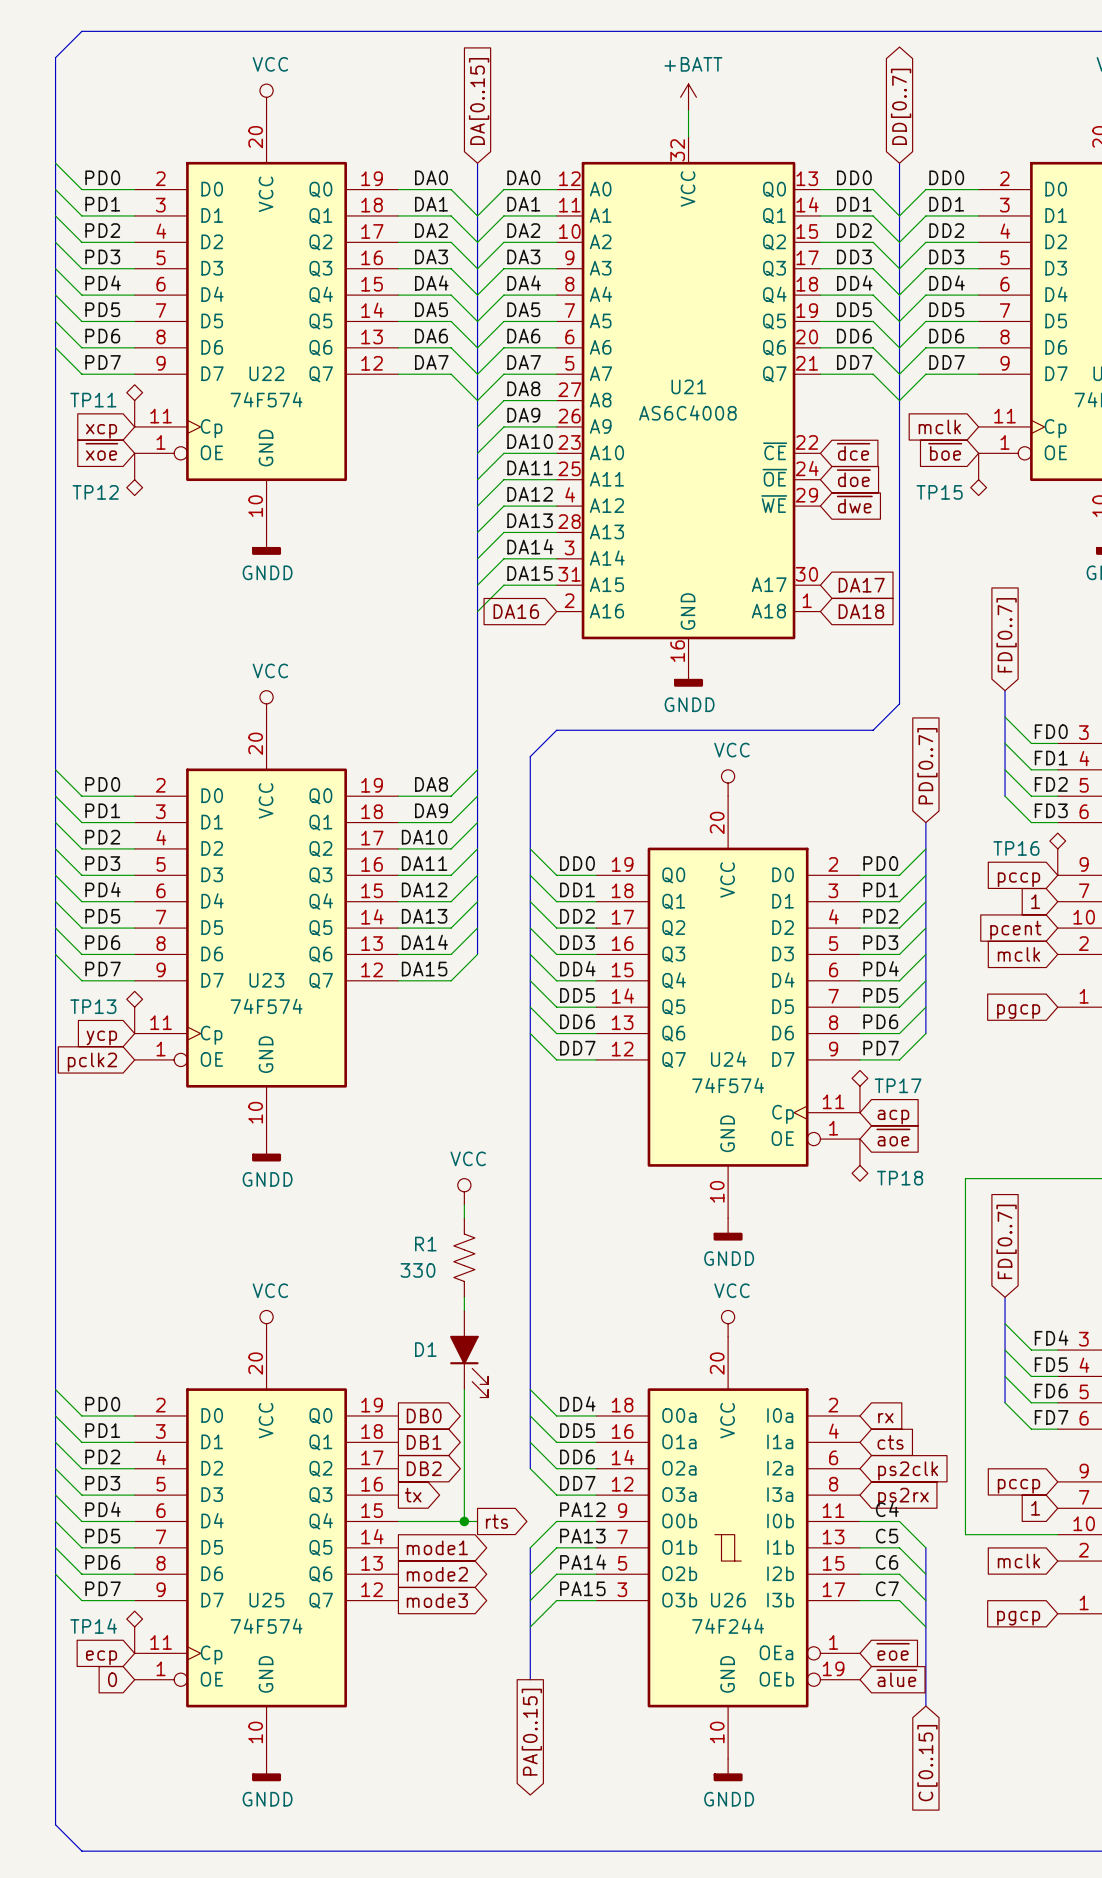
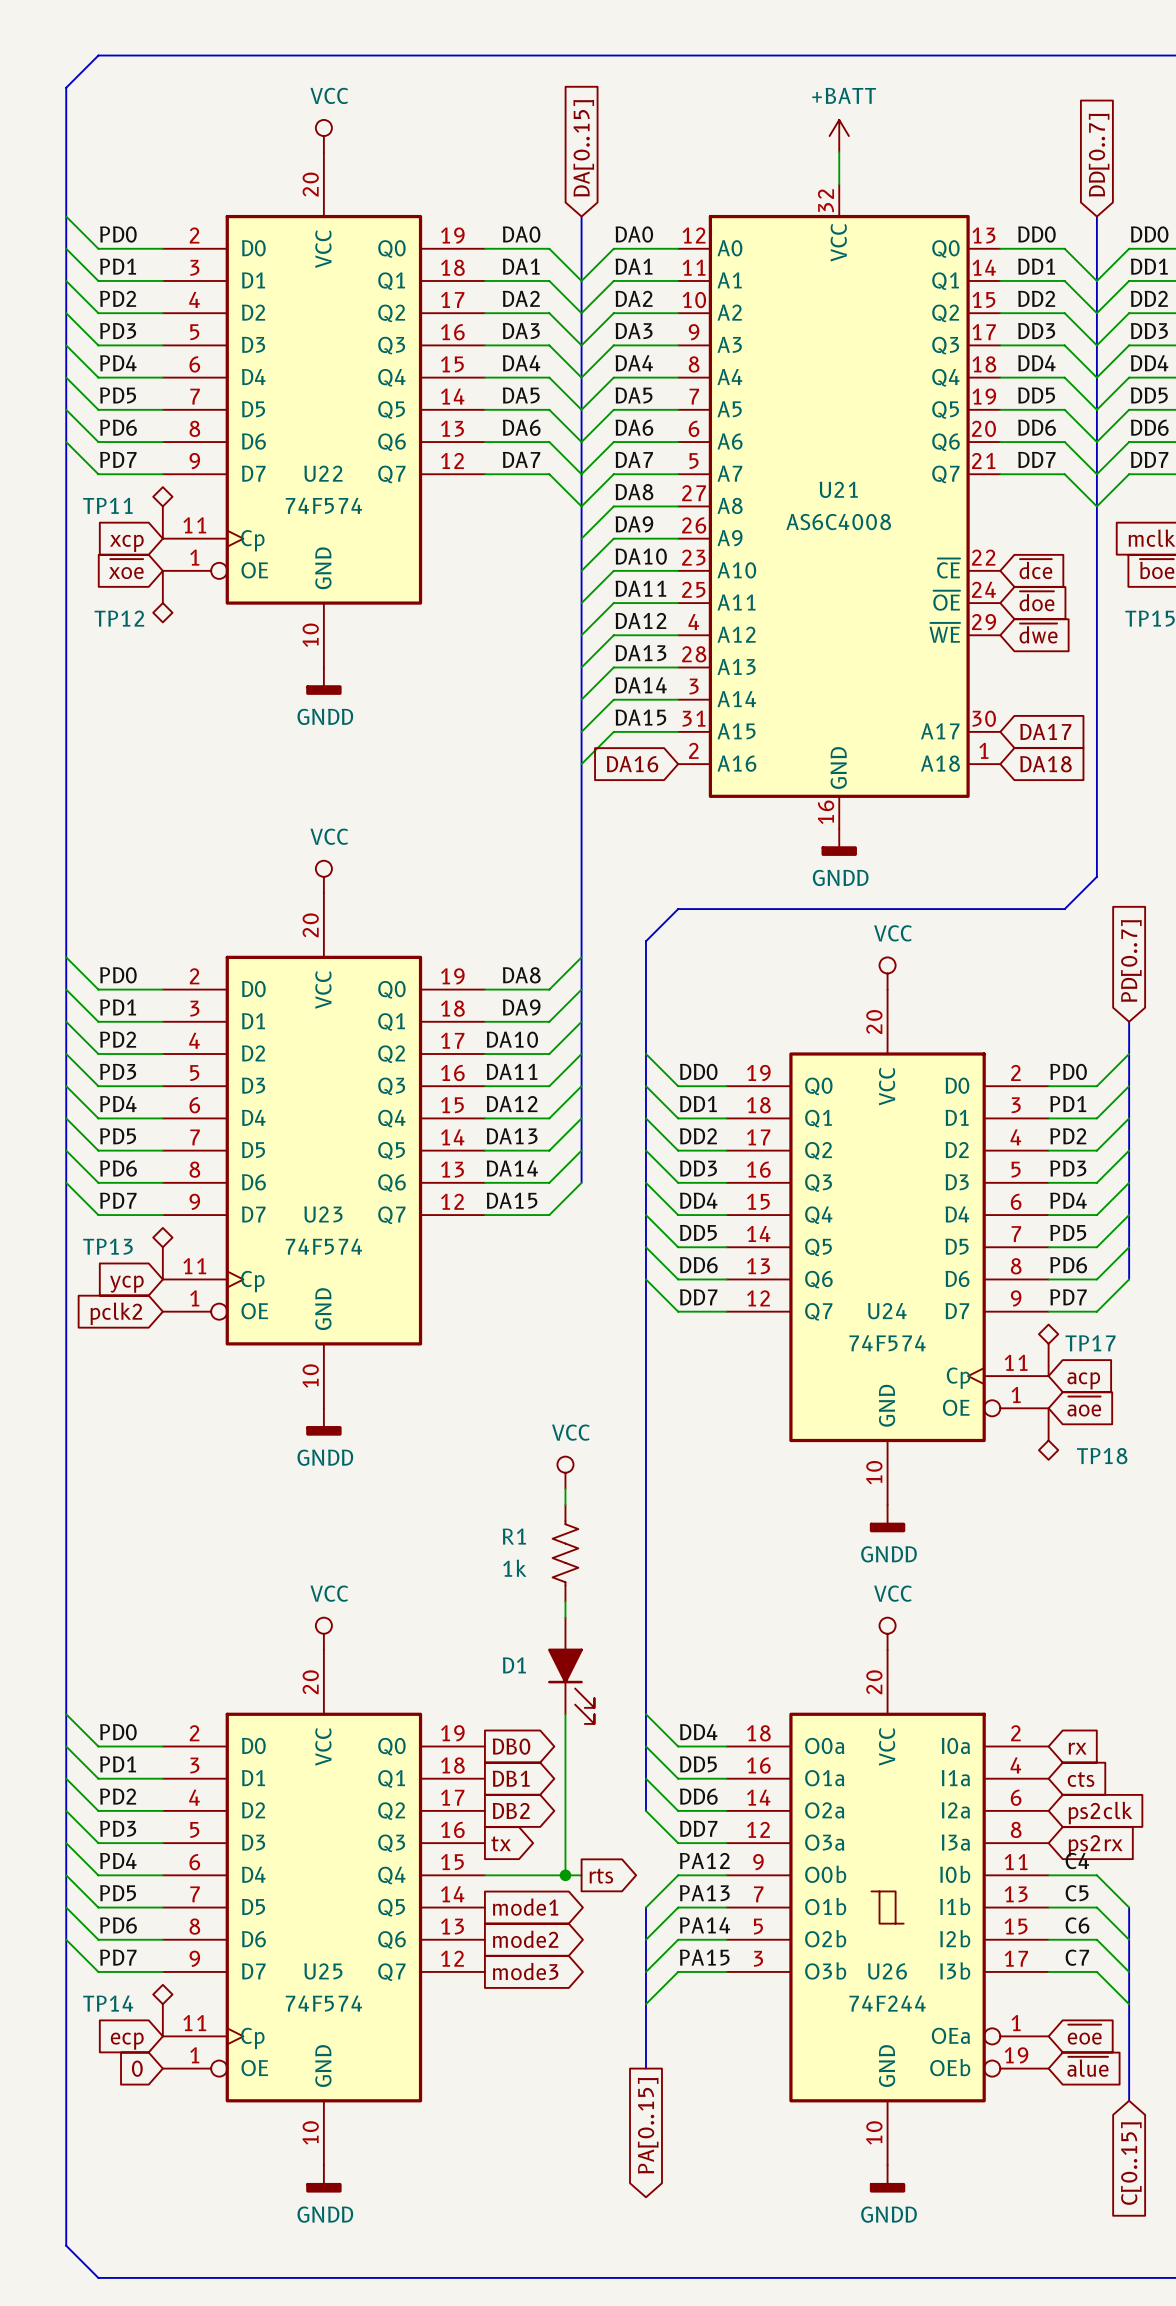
global label shape: bidirectional (901, 106) -> input (1099, 155)
R1 value: 330 (417, 1270) -> 1k (514, 1568)

